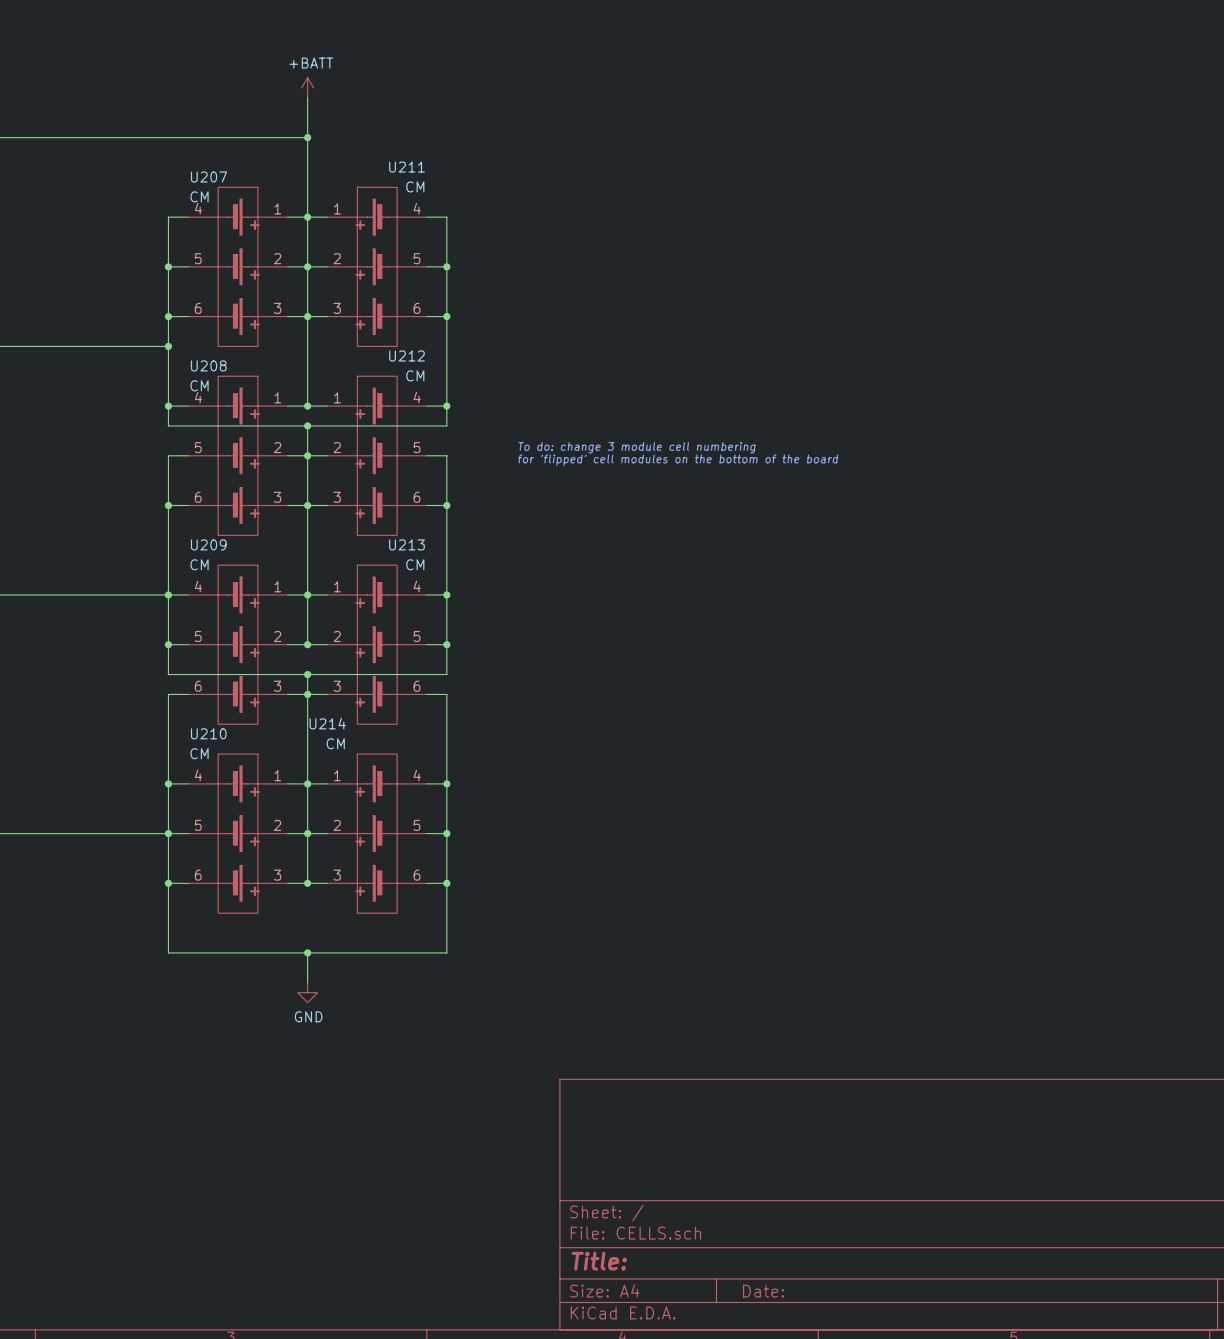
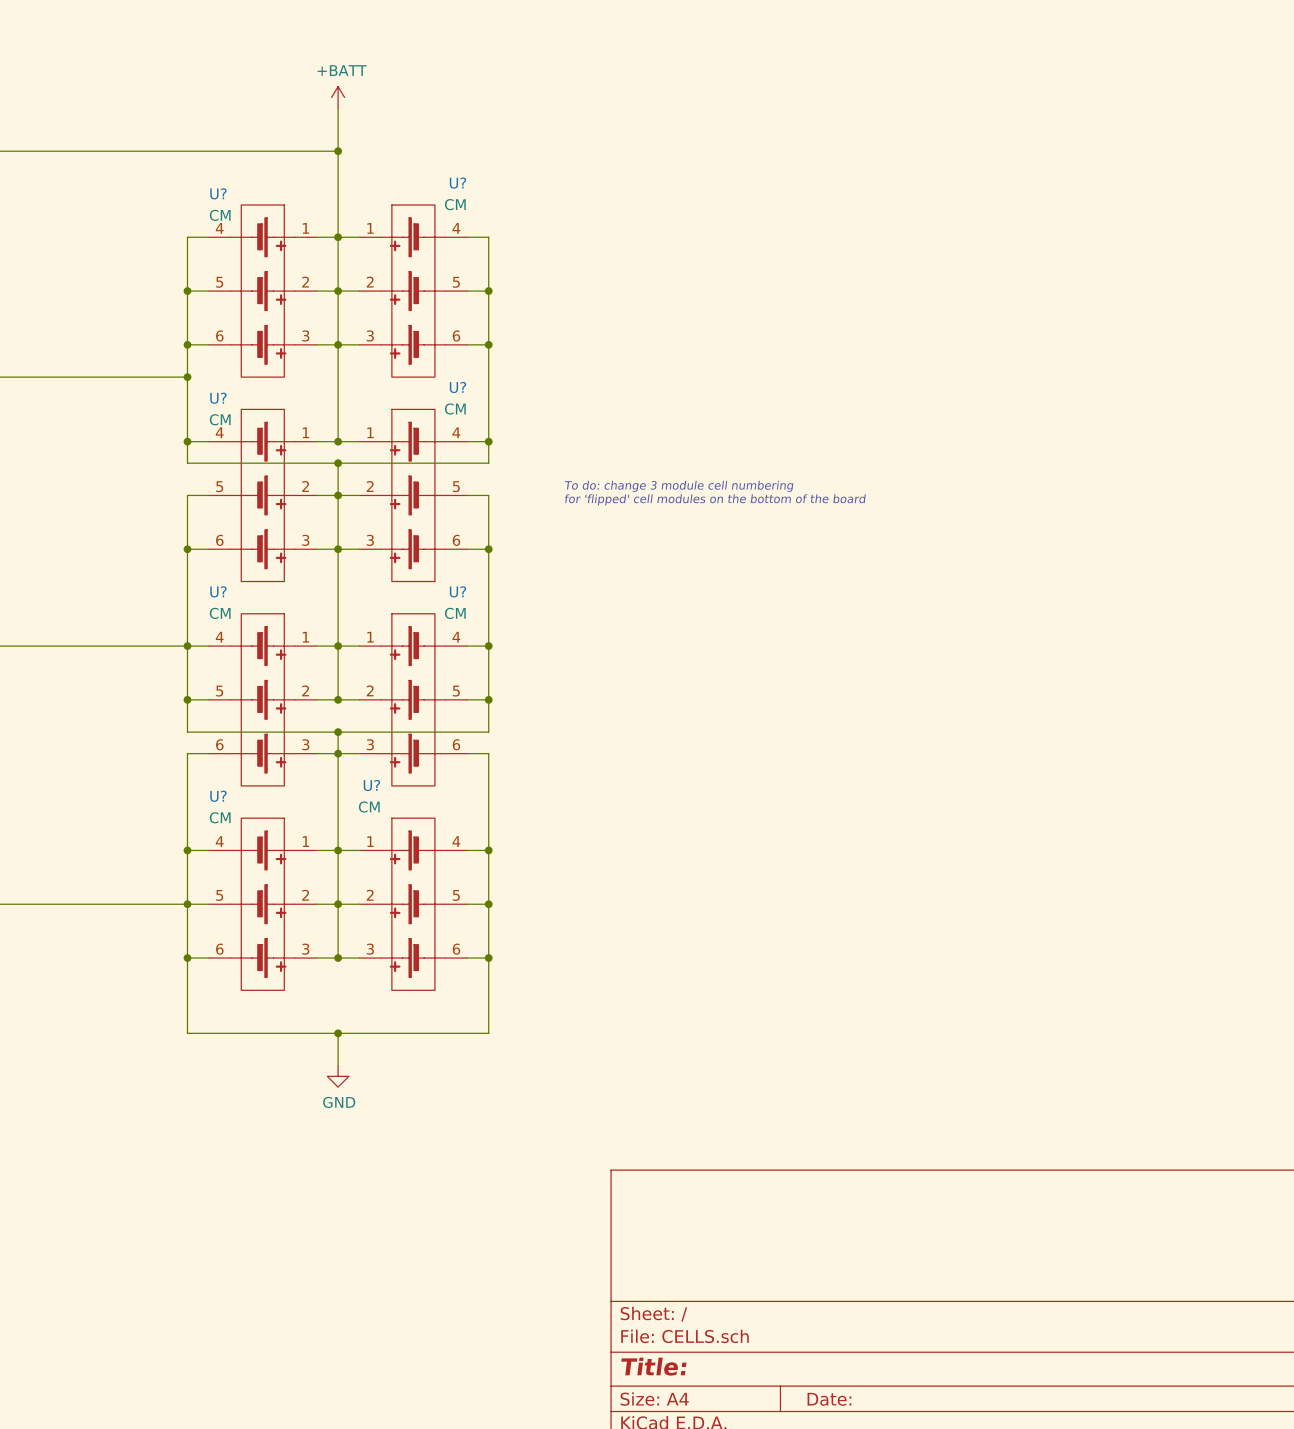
U211 name: U211 (406, 167) -> U? (458, 183)
U207 name: U207 (208, 177) -> U? (218, 193)
U212 name: U212 (406, 355) -> U? (458, 387)
U208 name: U208 (208, 365) -> U? (218, 398)
U209 name: U209 (208, 544) -> U? (218, 591)
U213 name: U213 (406, 544) -> U? (458, 591)
U214 name: U214 (327, 723) -> U? (371, 785)
U210 name: U210 (208, 733) -> U? (218, 796)

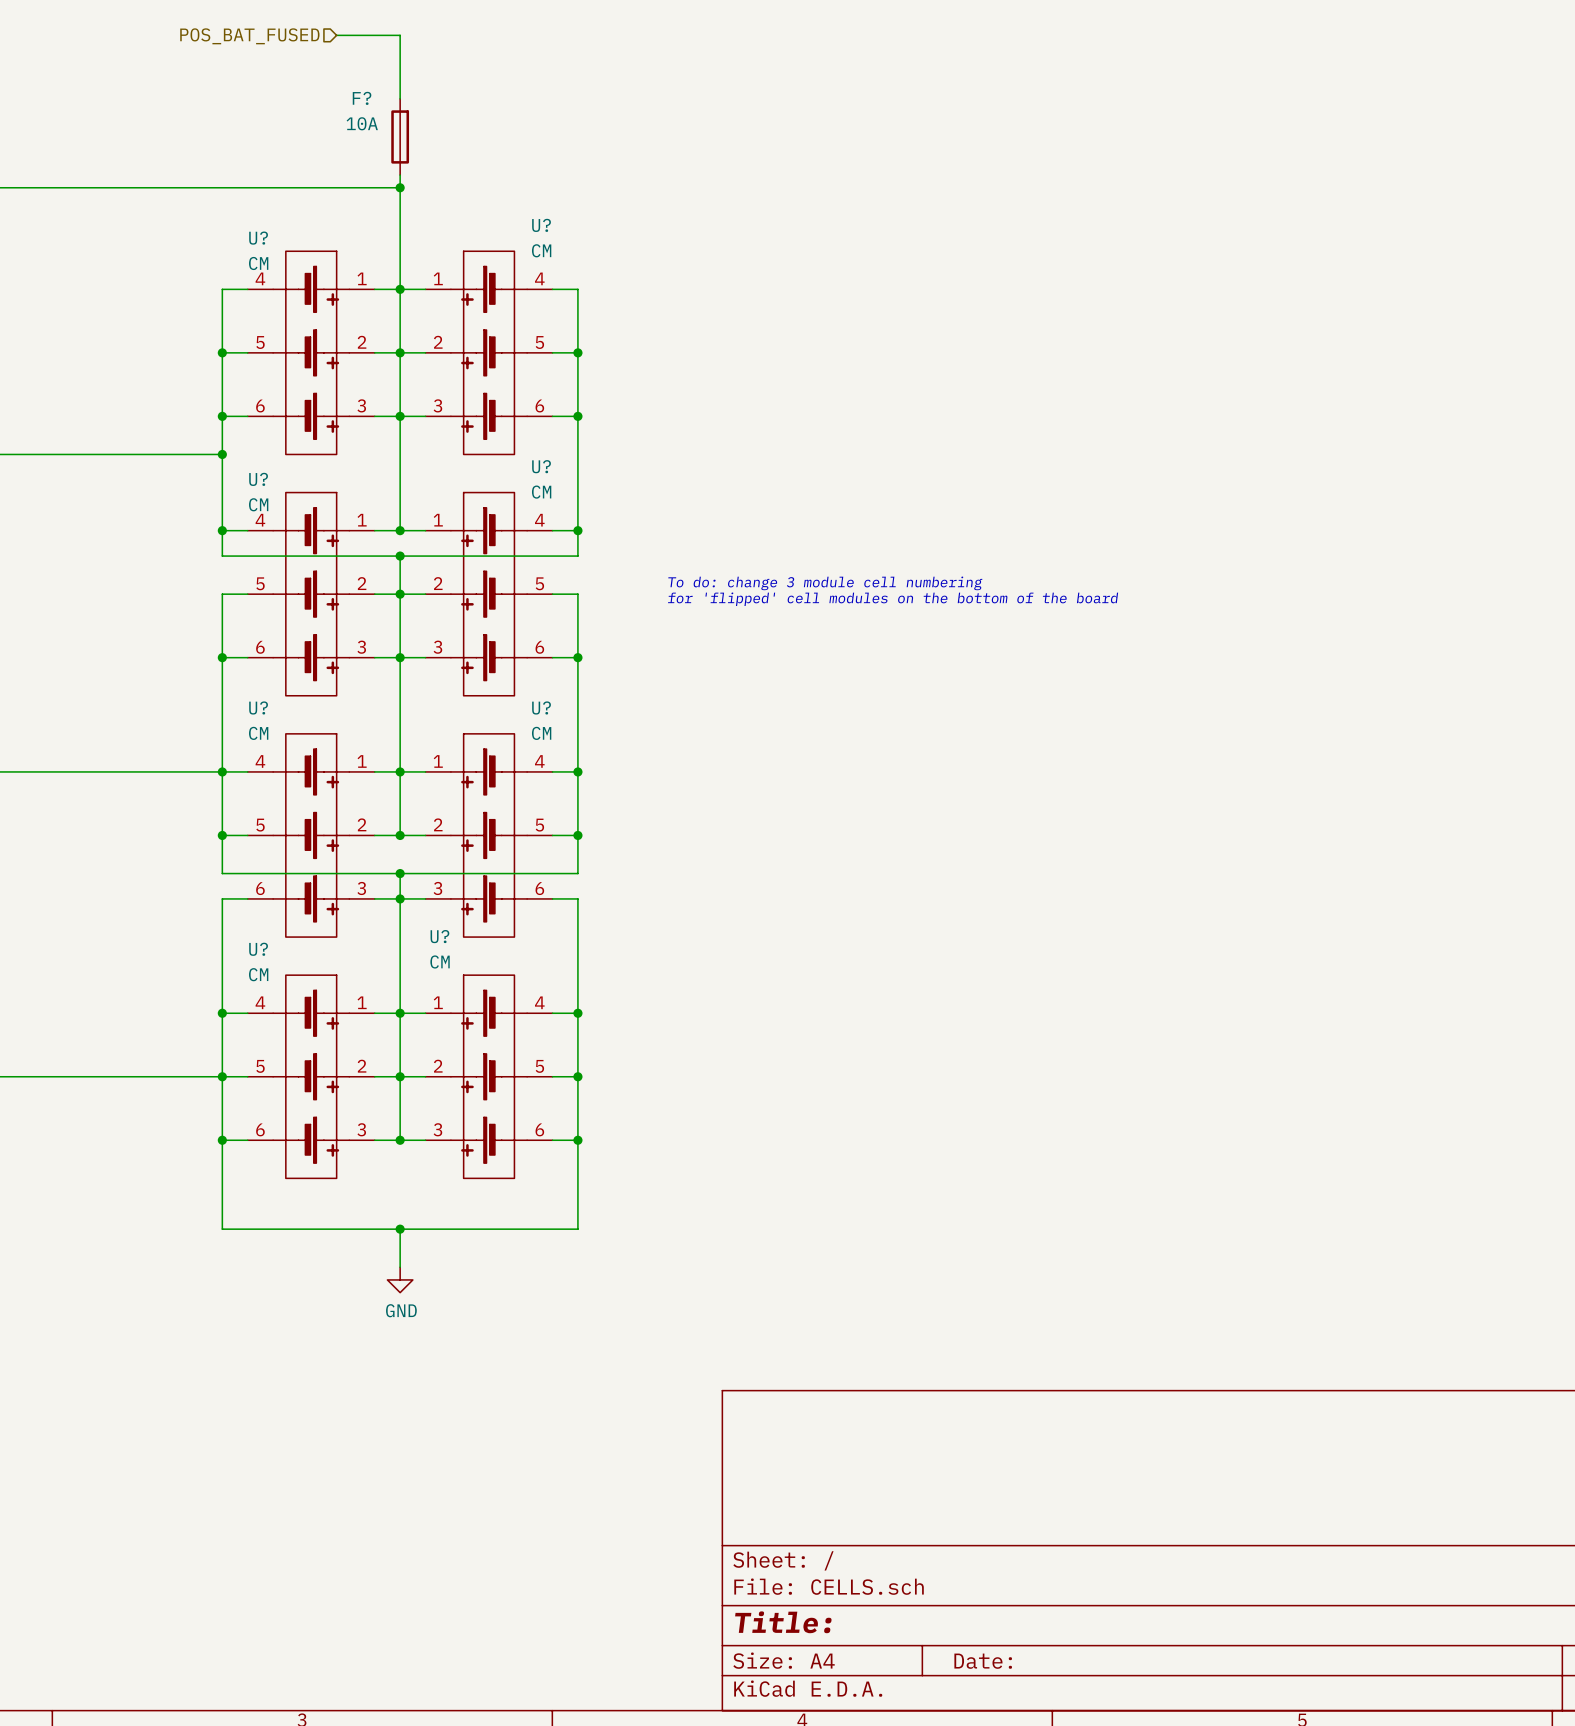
wire: none -> (336, 35) (400, 35) (400, 98)
hierarchical label: none -> POS_BAT_FUSED (249, 36)
power symbol: +BATT (338, 97) -> none
F?: none -> 10A (400, 136)

